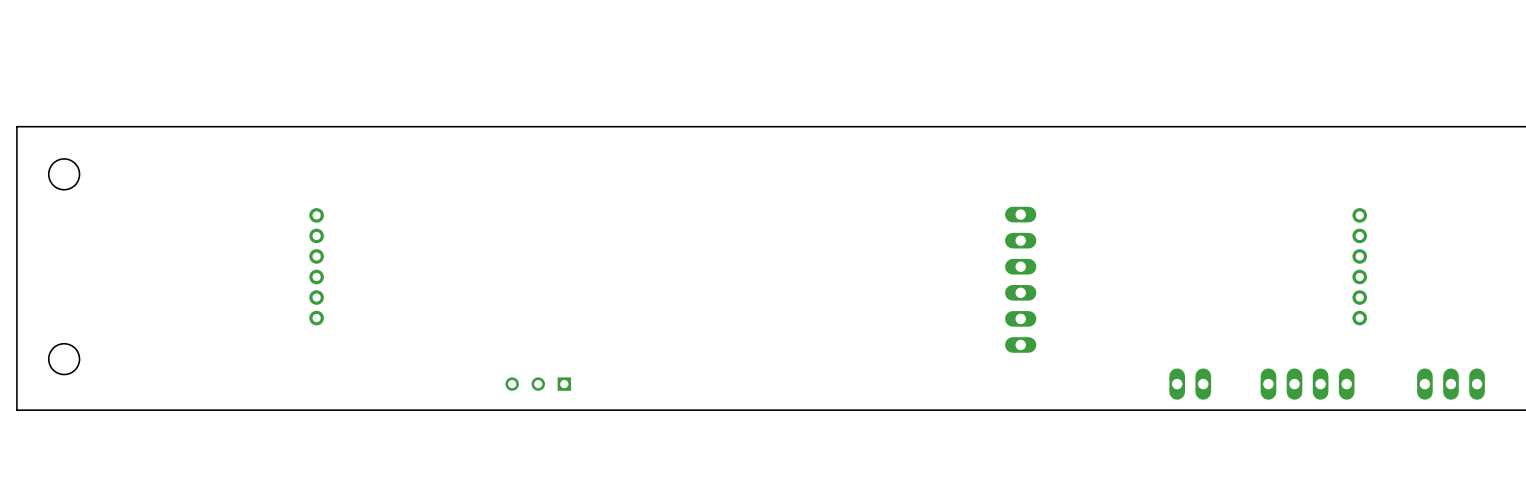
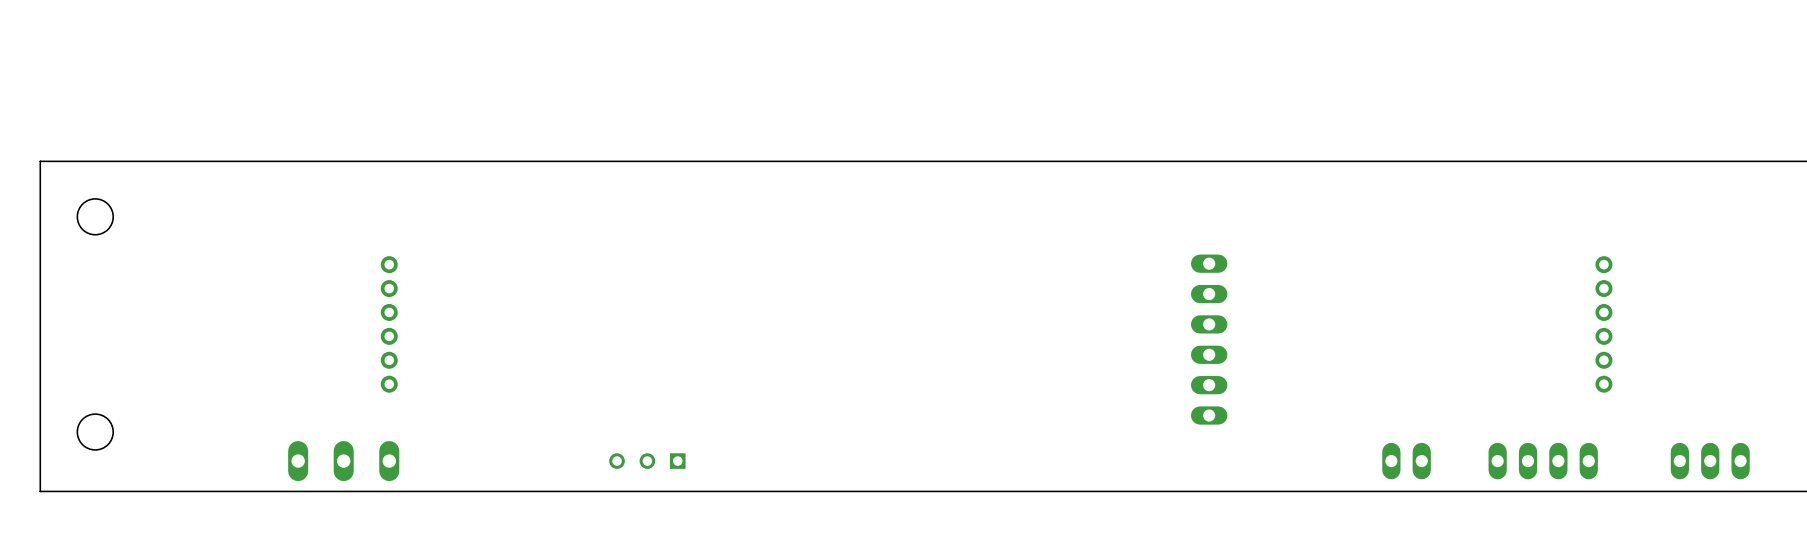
part: none -> (343, 461)

